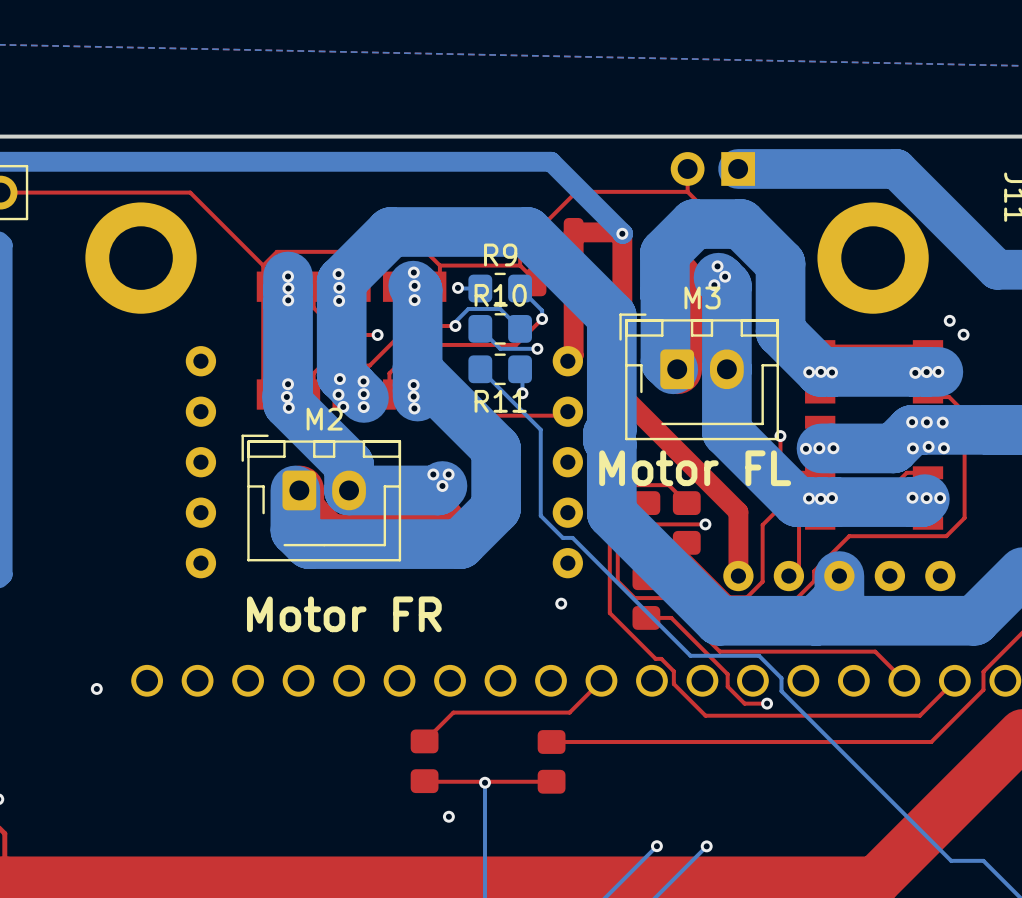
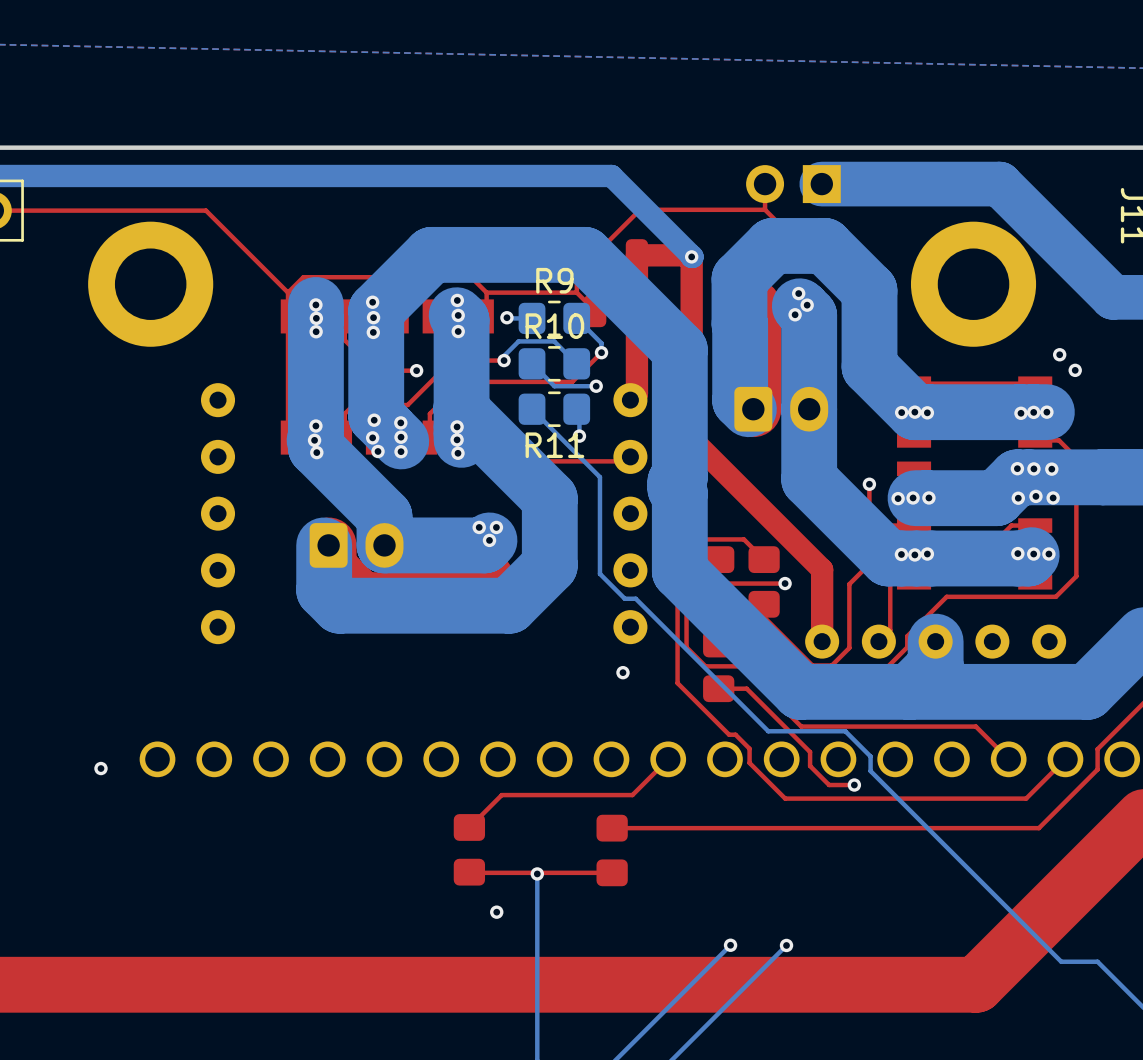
M3 side: bottom (699, 376) -> top (781, 409)
text: Motor FL (695, 468) -> none
M2 side: bottom (321, 498) -> top (356, 545)
text: Motor FR (344, 614) -> none

